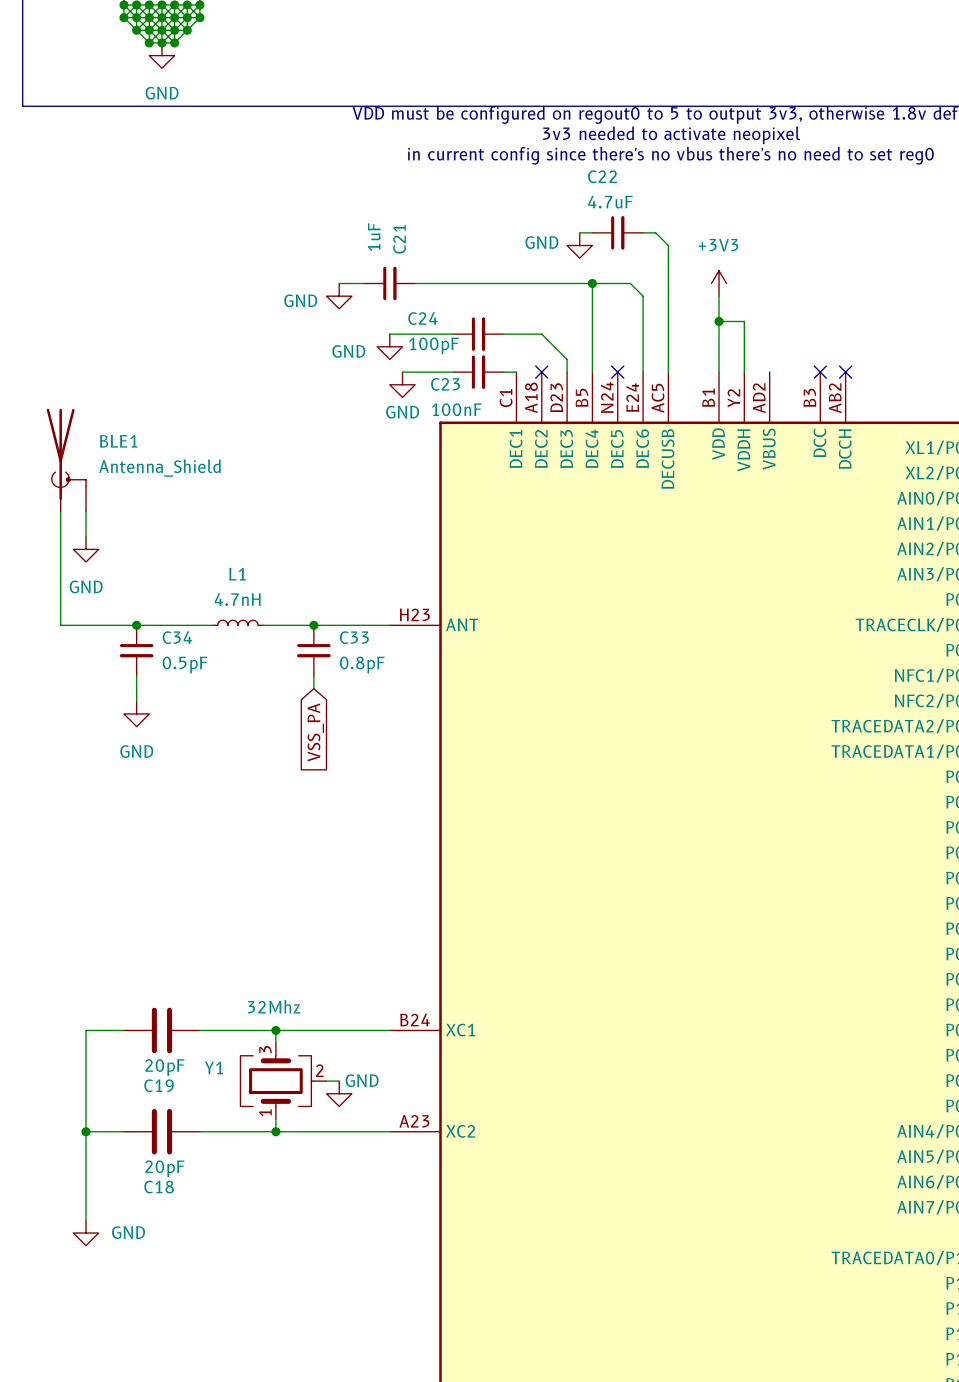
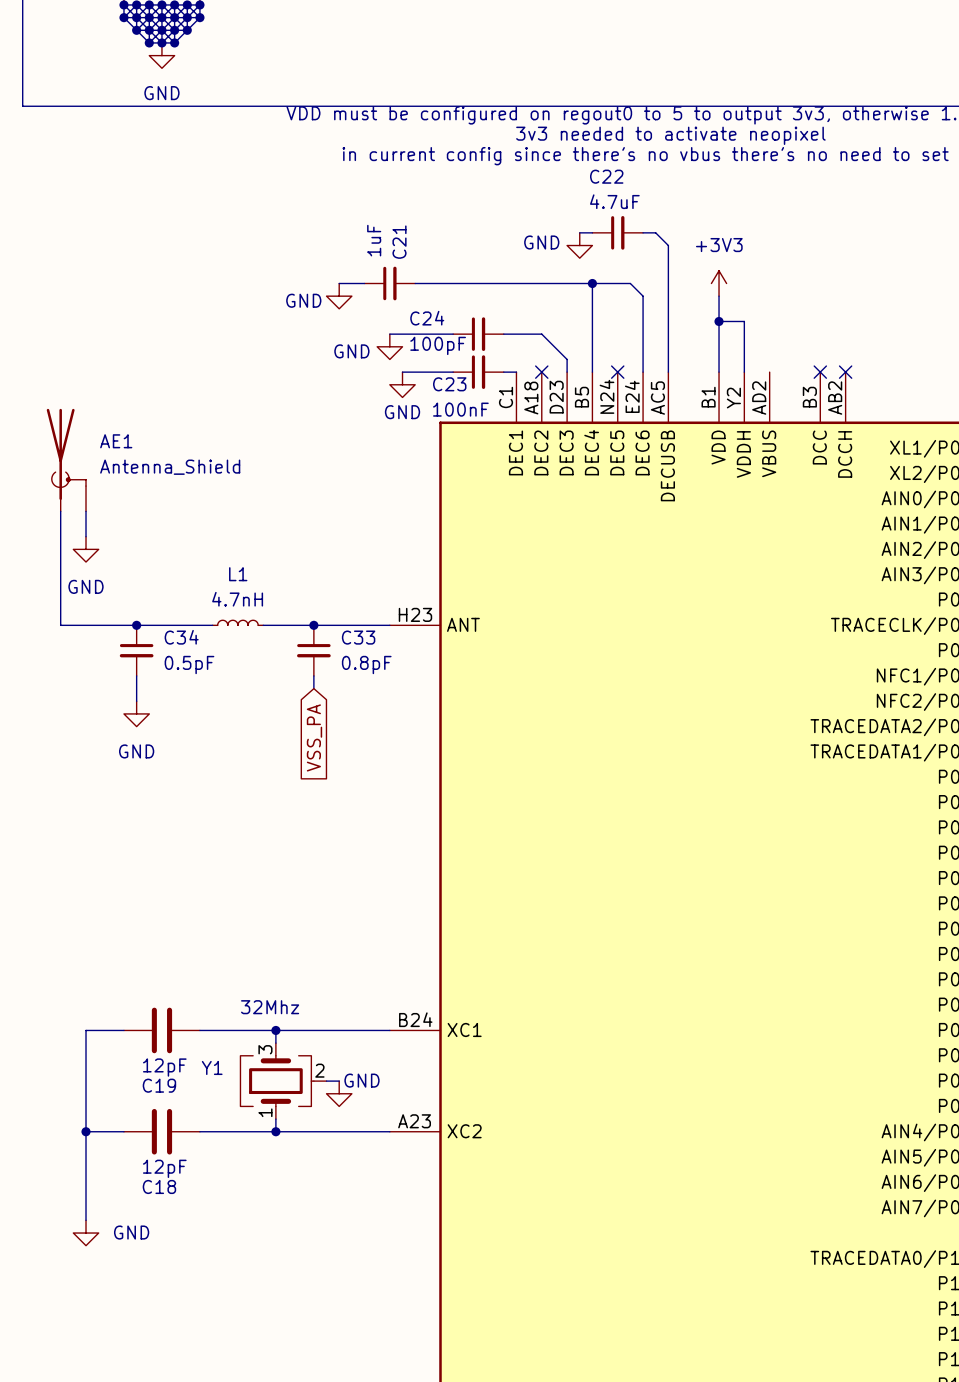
BLE1 name: BLE1 (118, 441) -> AE1 (116, 441)
C19 value: 20pF (164, 1067) -> 12pF (164, 1067)
C18 value: 20pF (164, 1168) -> 12pF (164, 1168)

